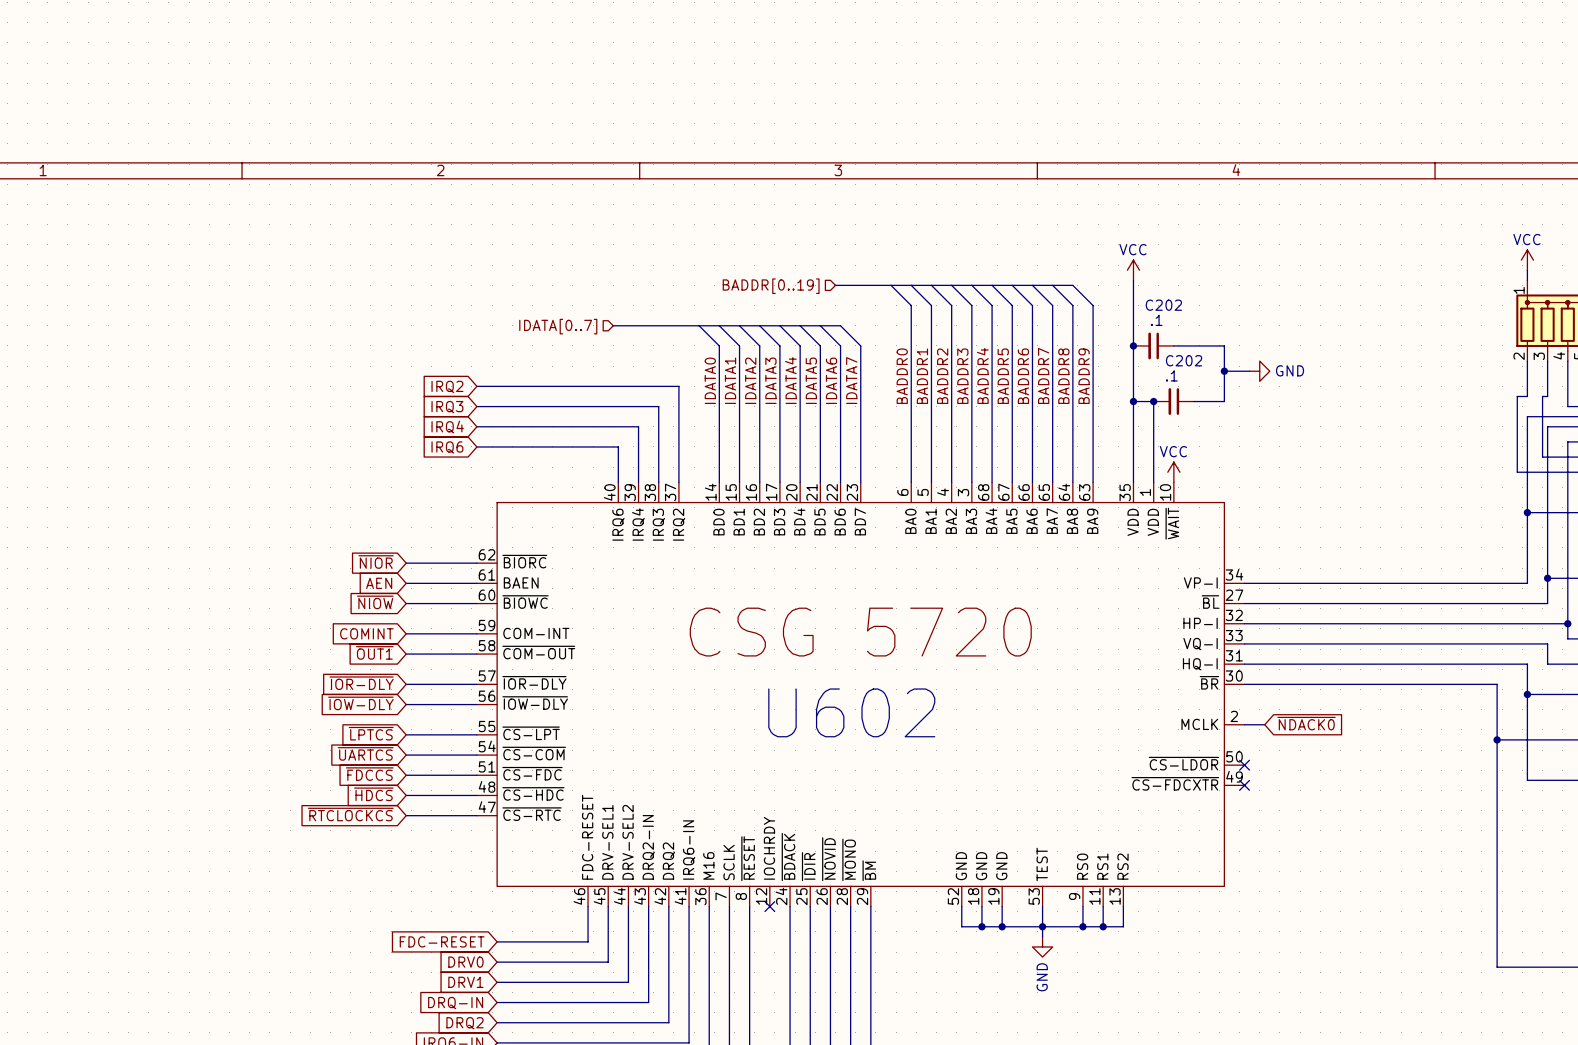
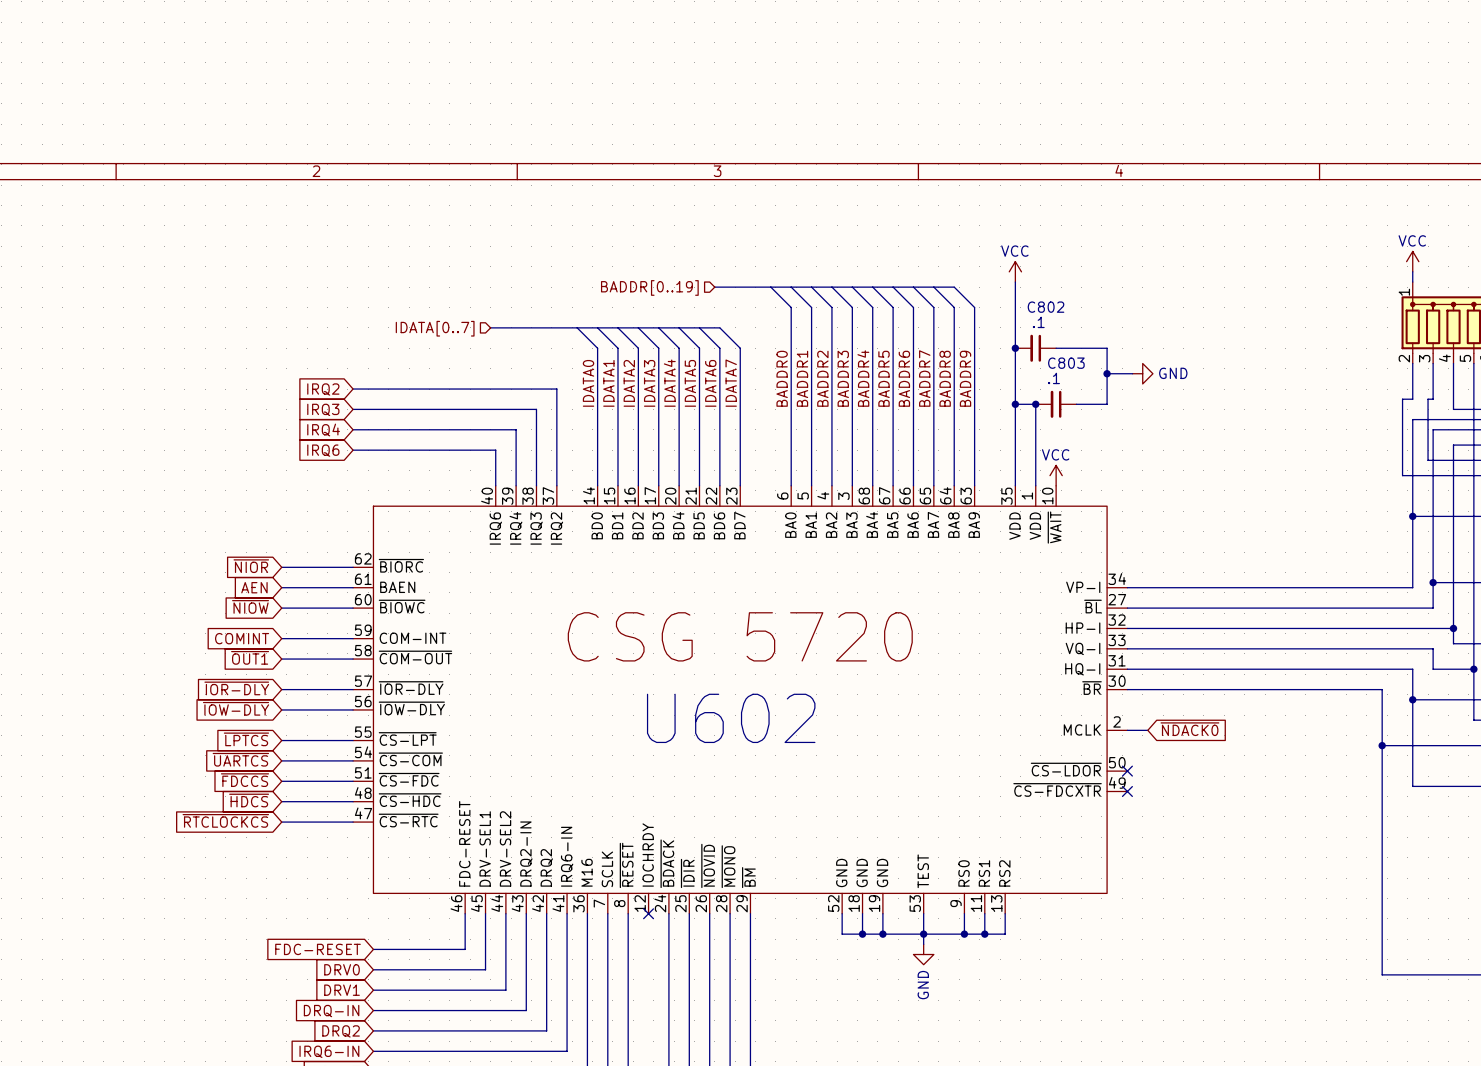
C202 name: C202 (1163, 305) -> C802 (1046, 307)
C202 name: C202 (1184, 360) -> C803 (1066, 363)

